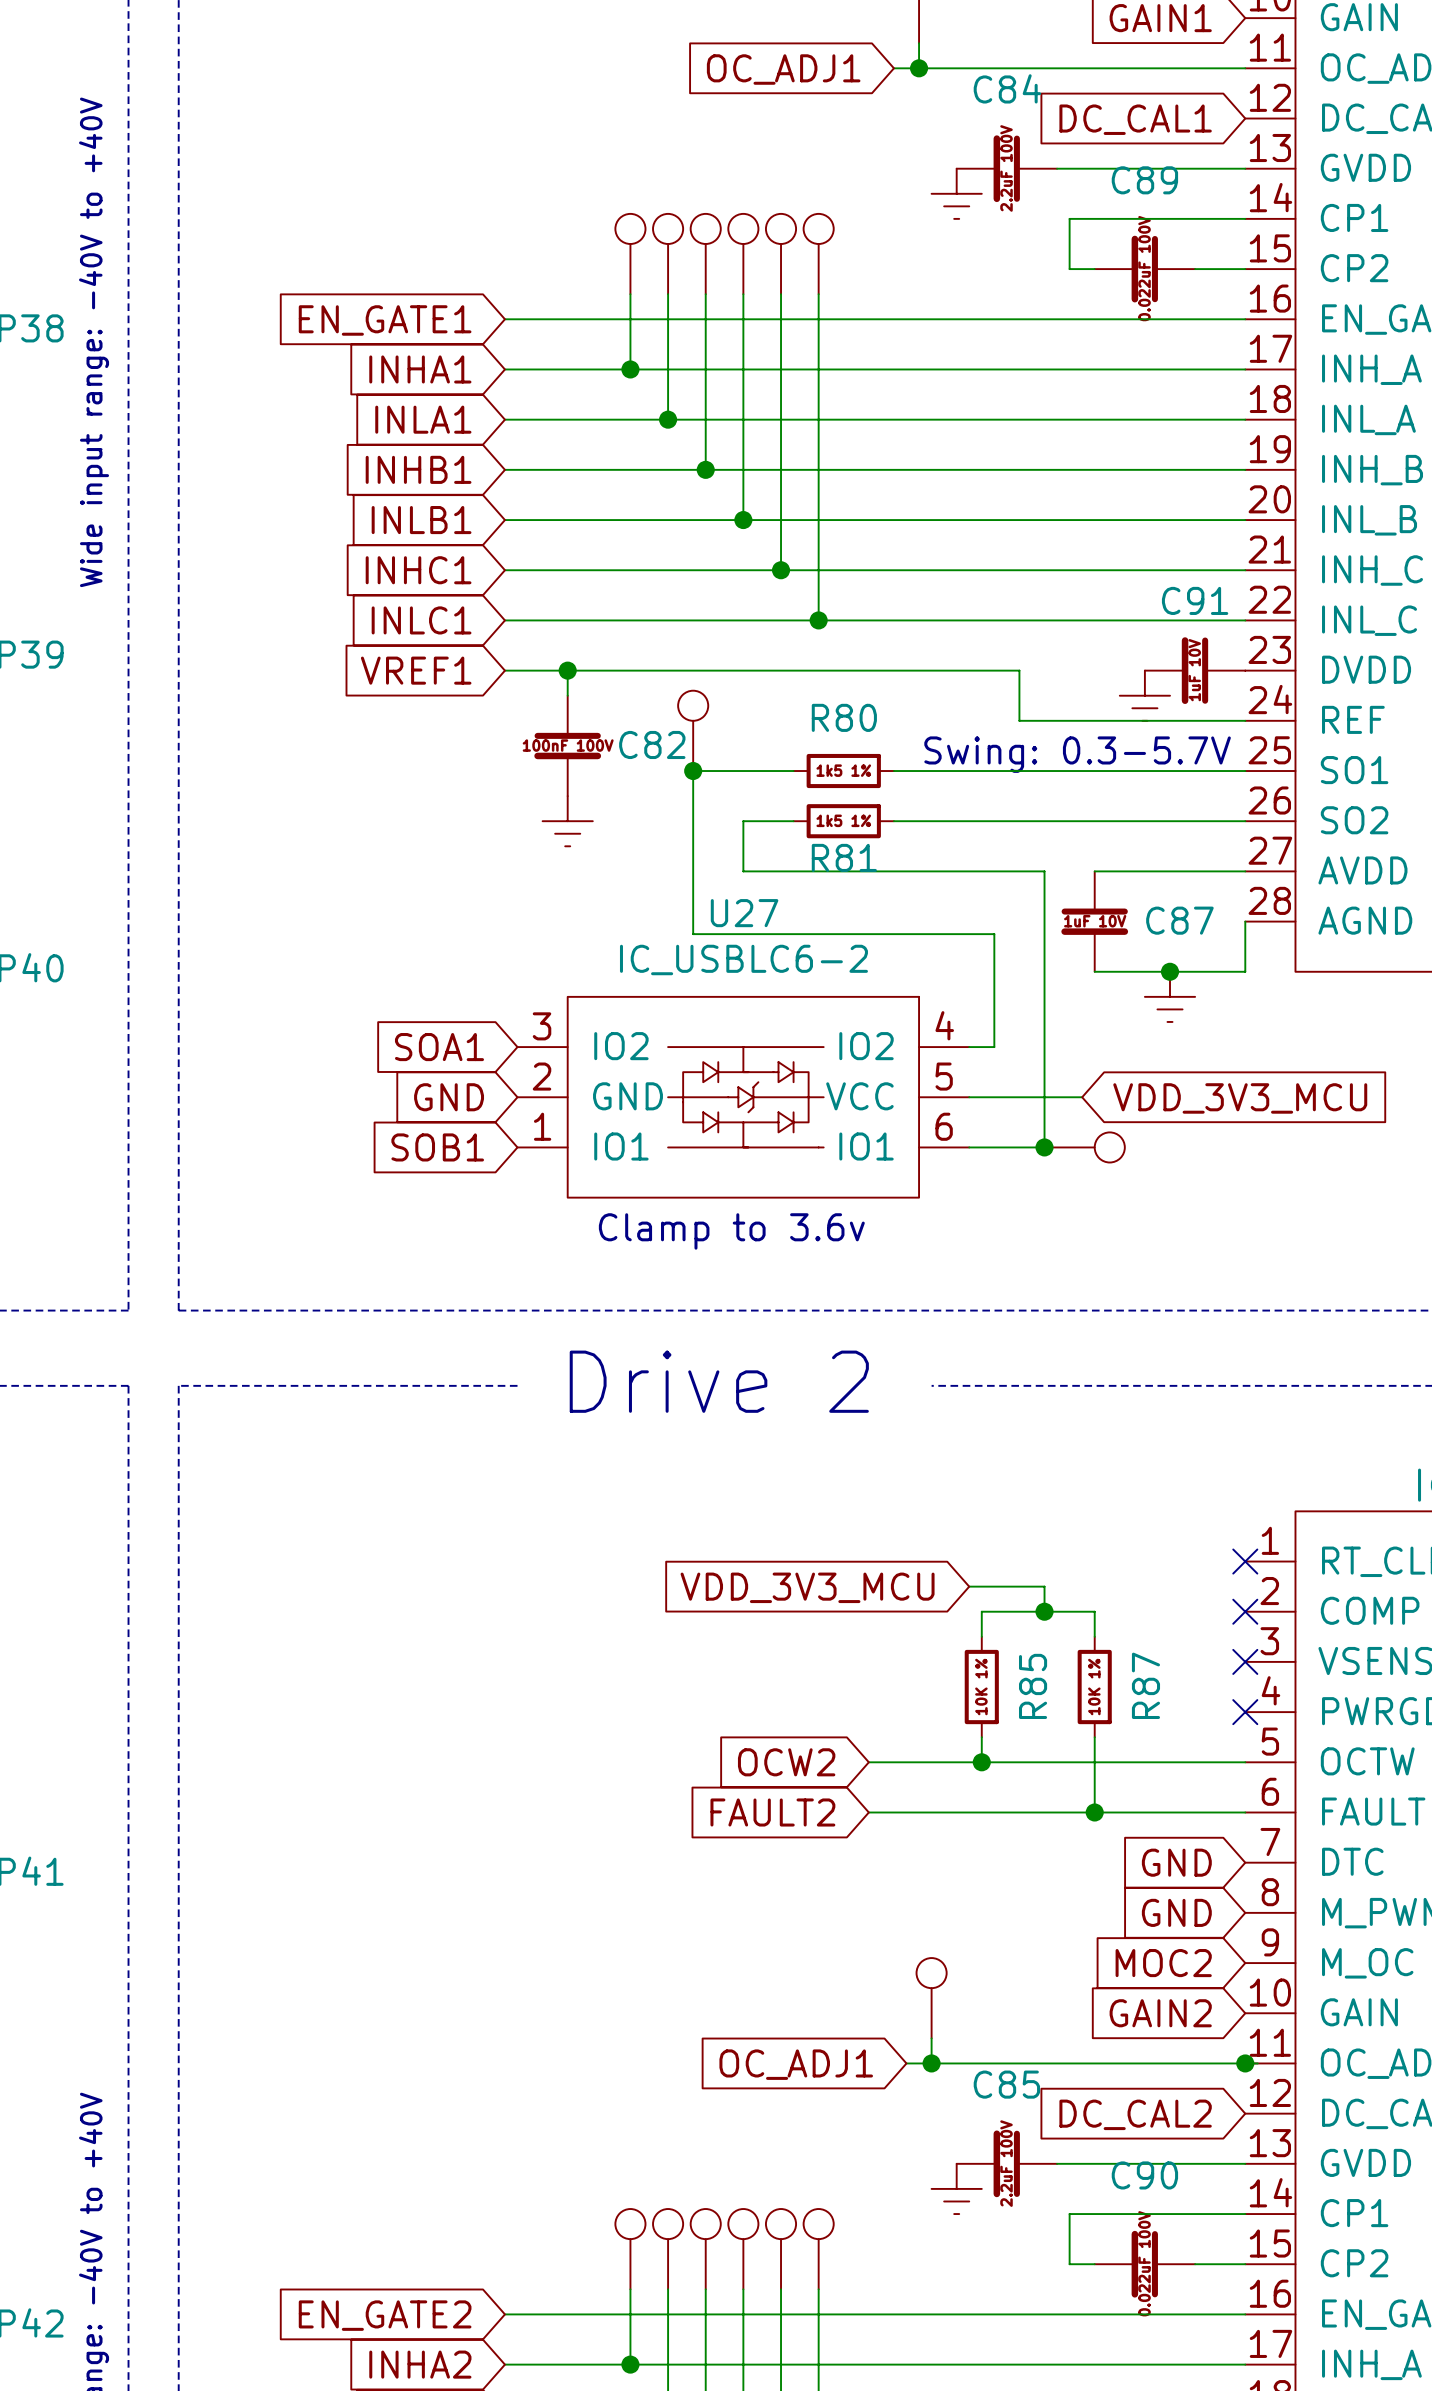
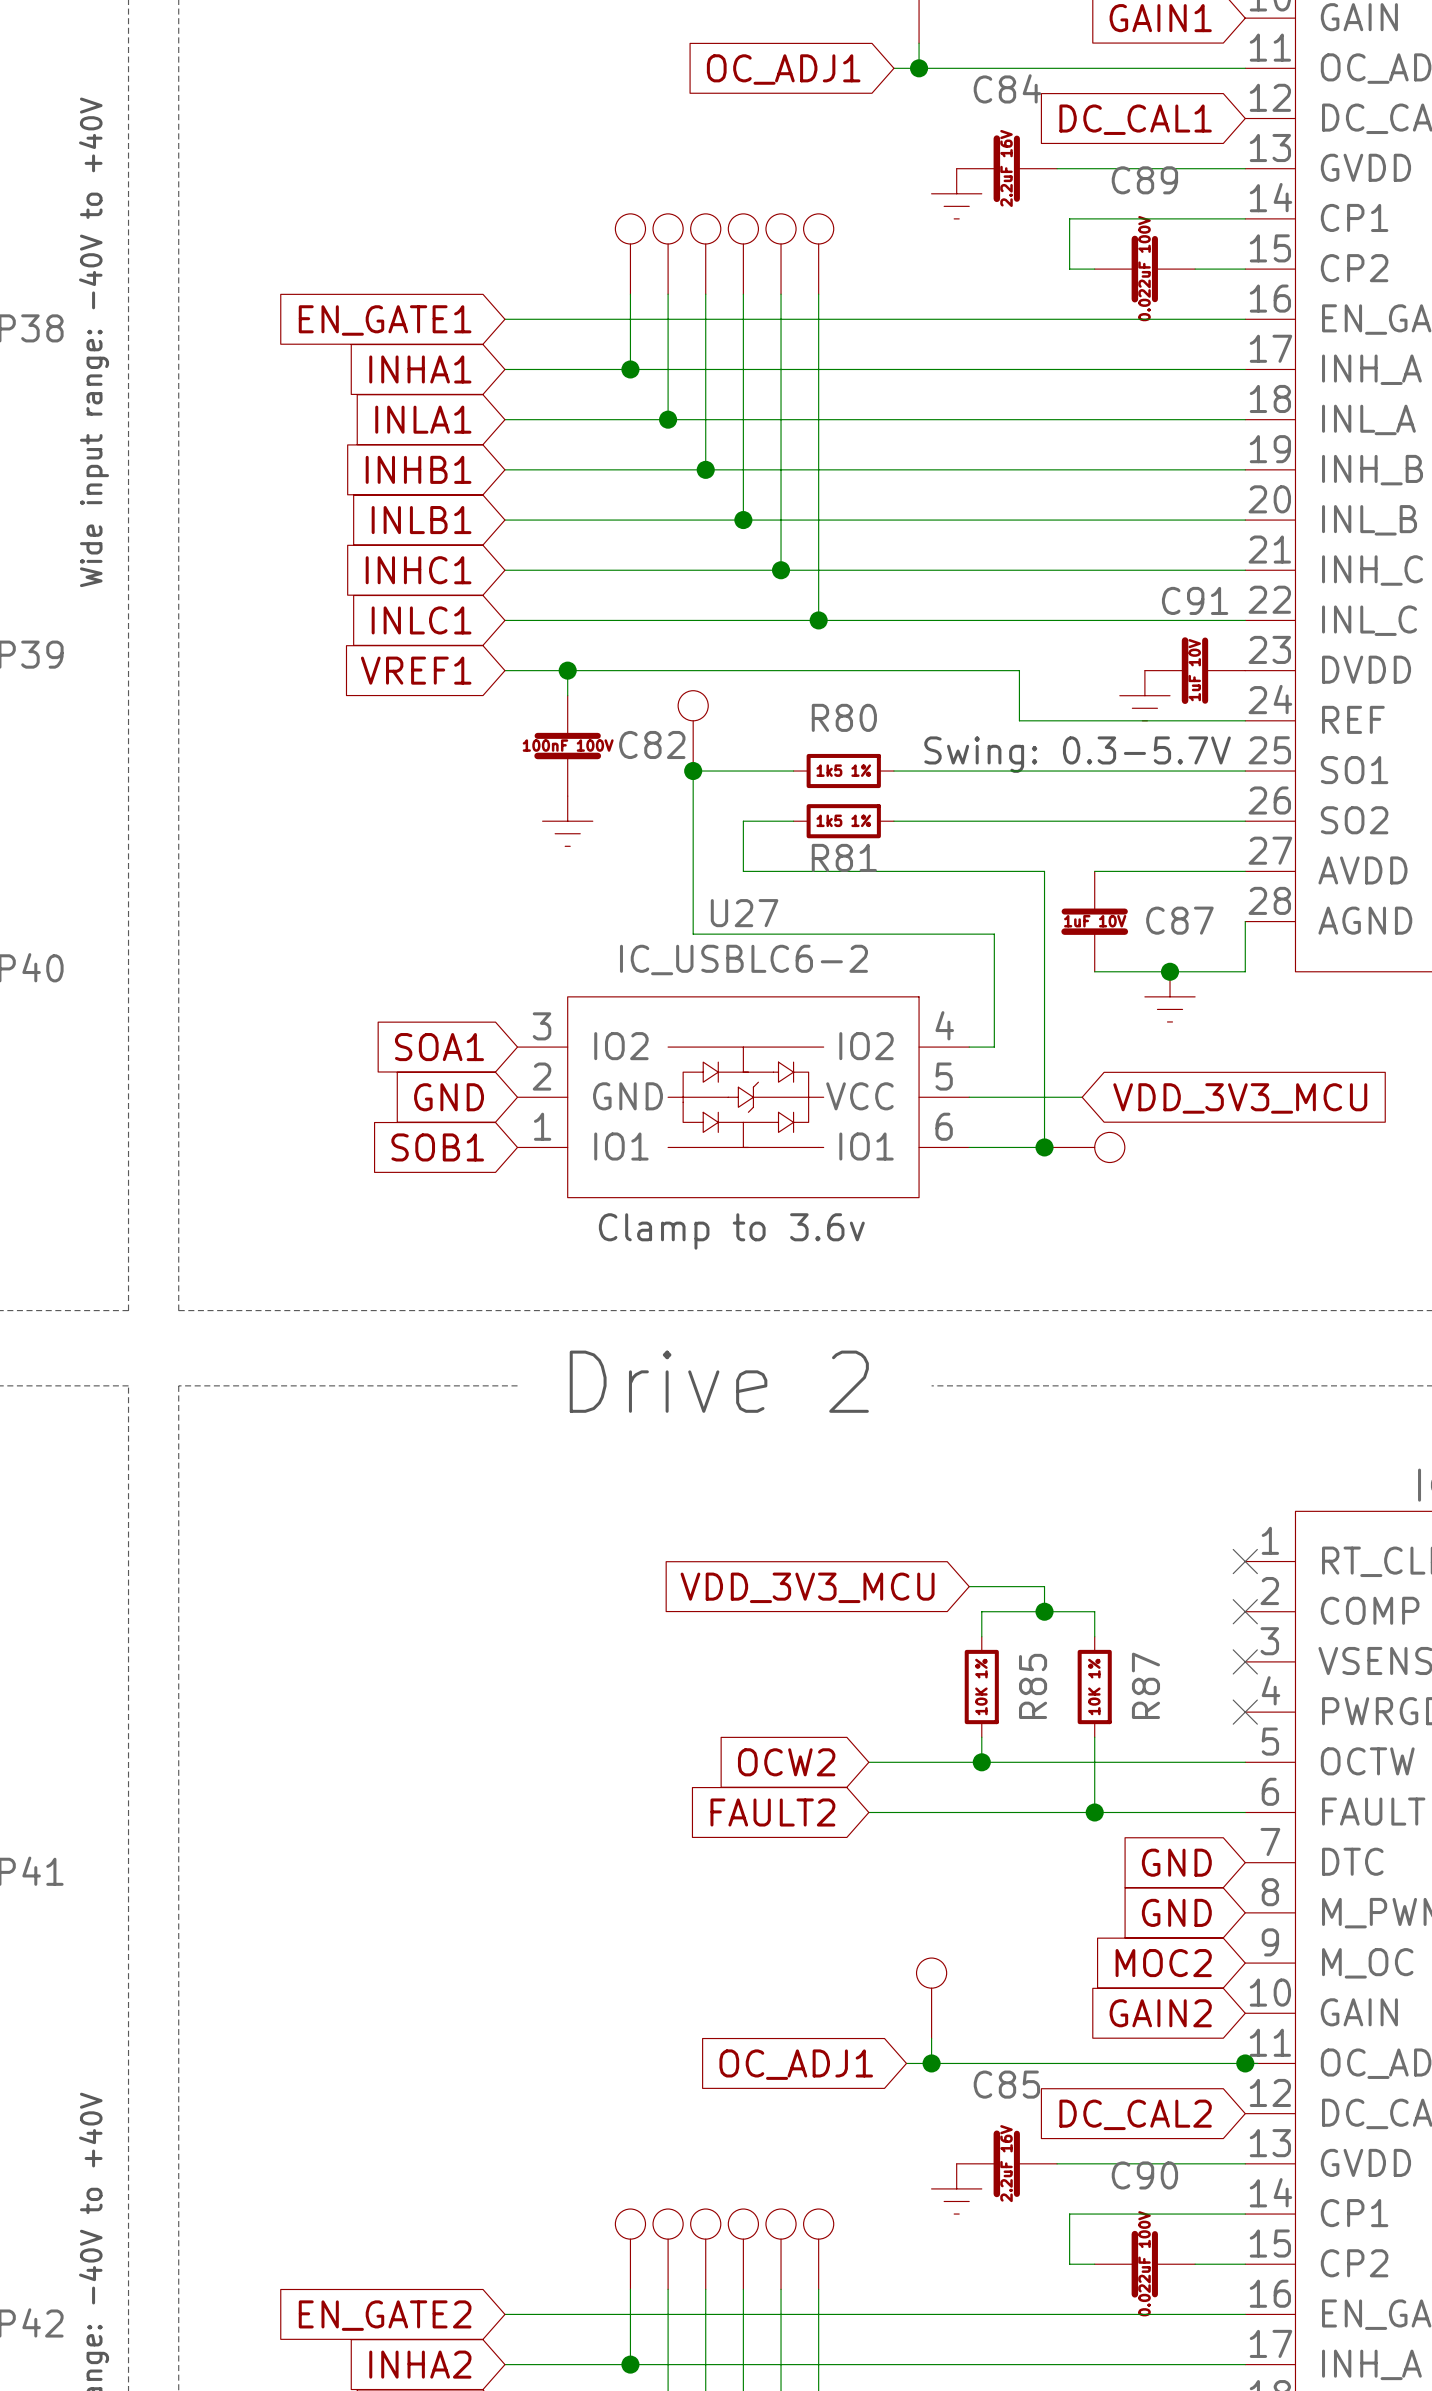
C84 text: 2.2uF 100V (1006, 168) -> 2.2uF 16V (1006, 168)
C85 text: 2.2uF 100V (1006, 2163) -> 2.2uF 16V (1006, 2163)

